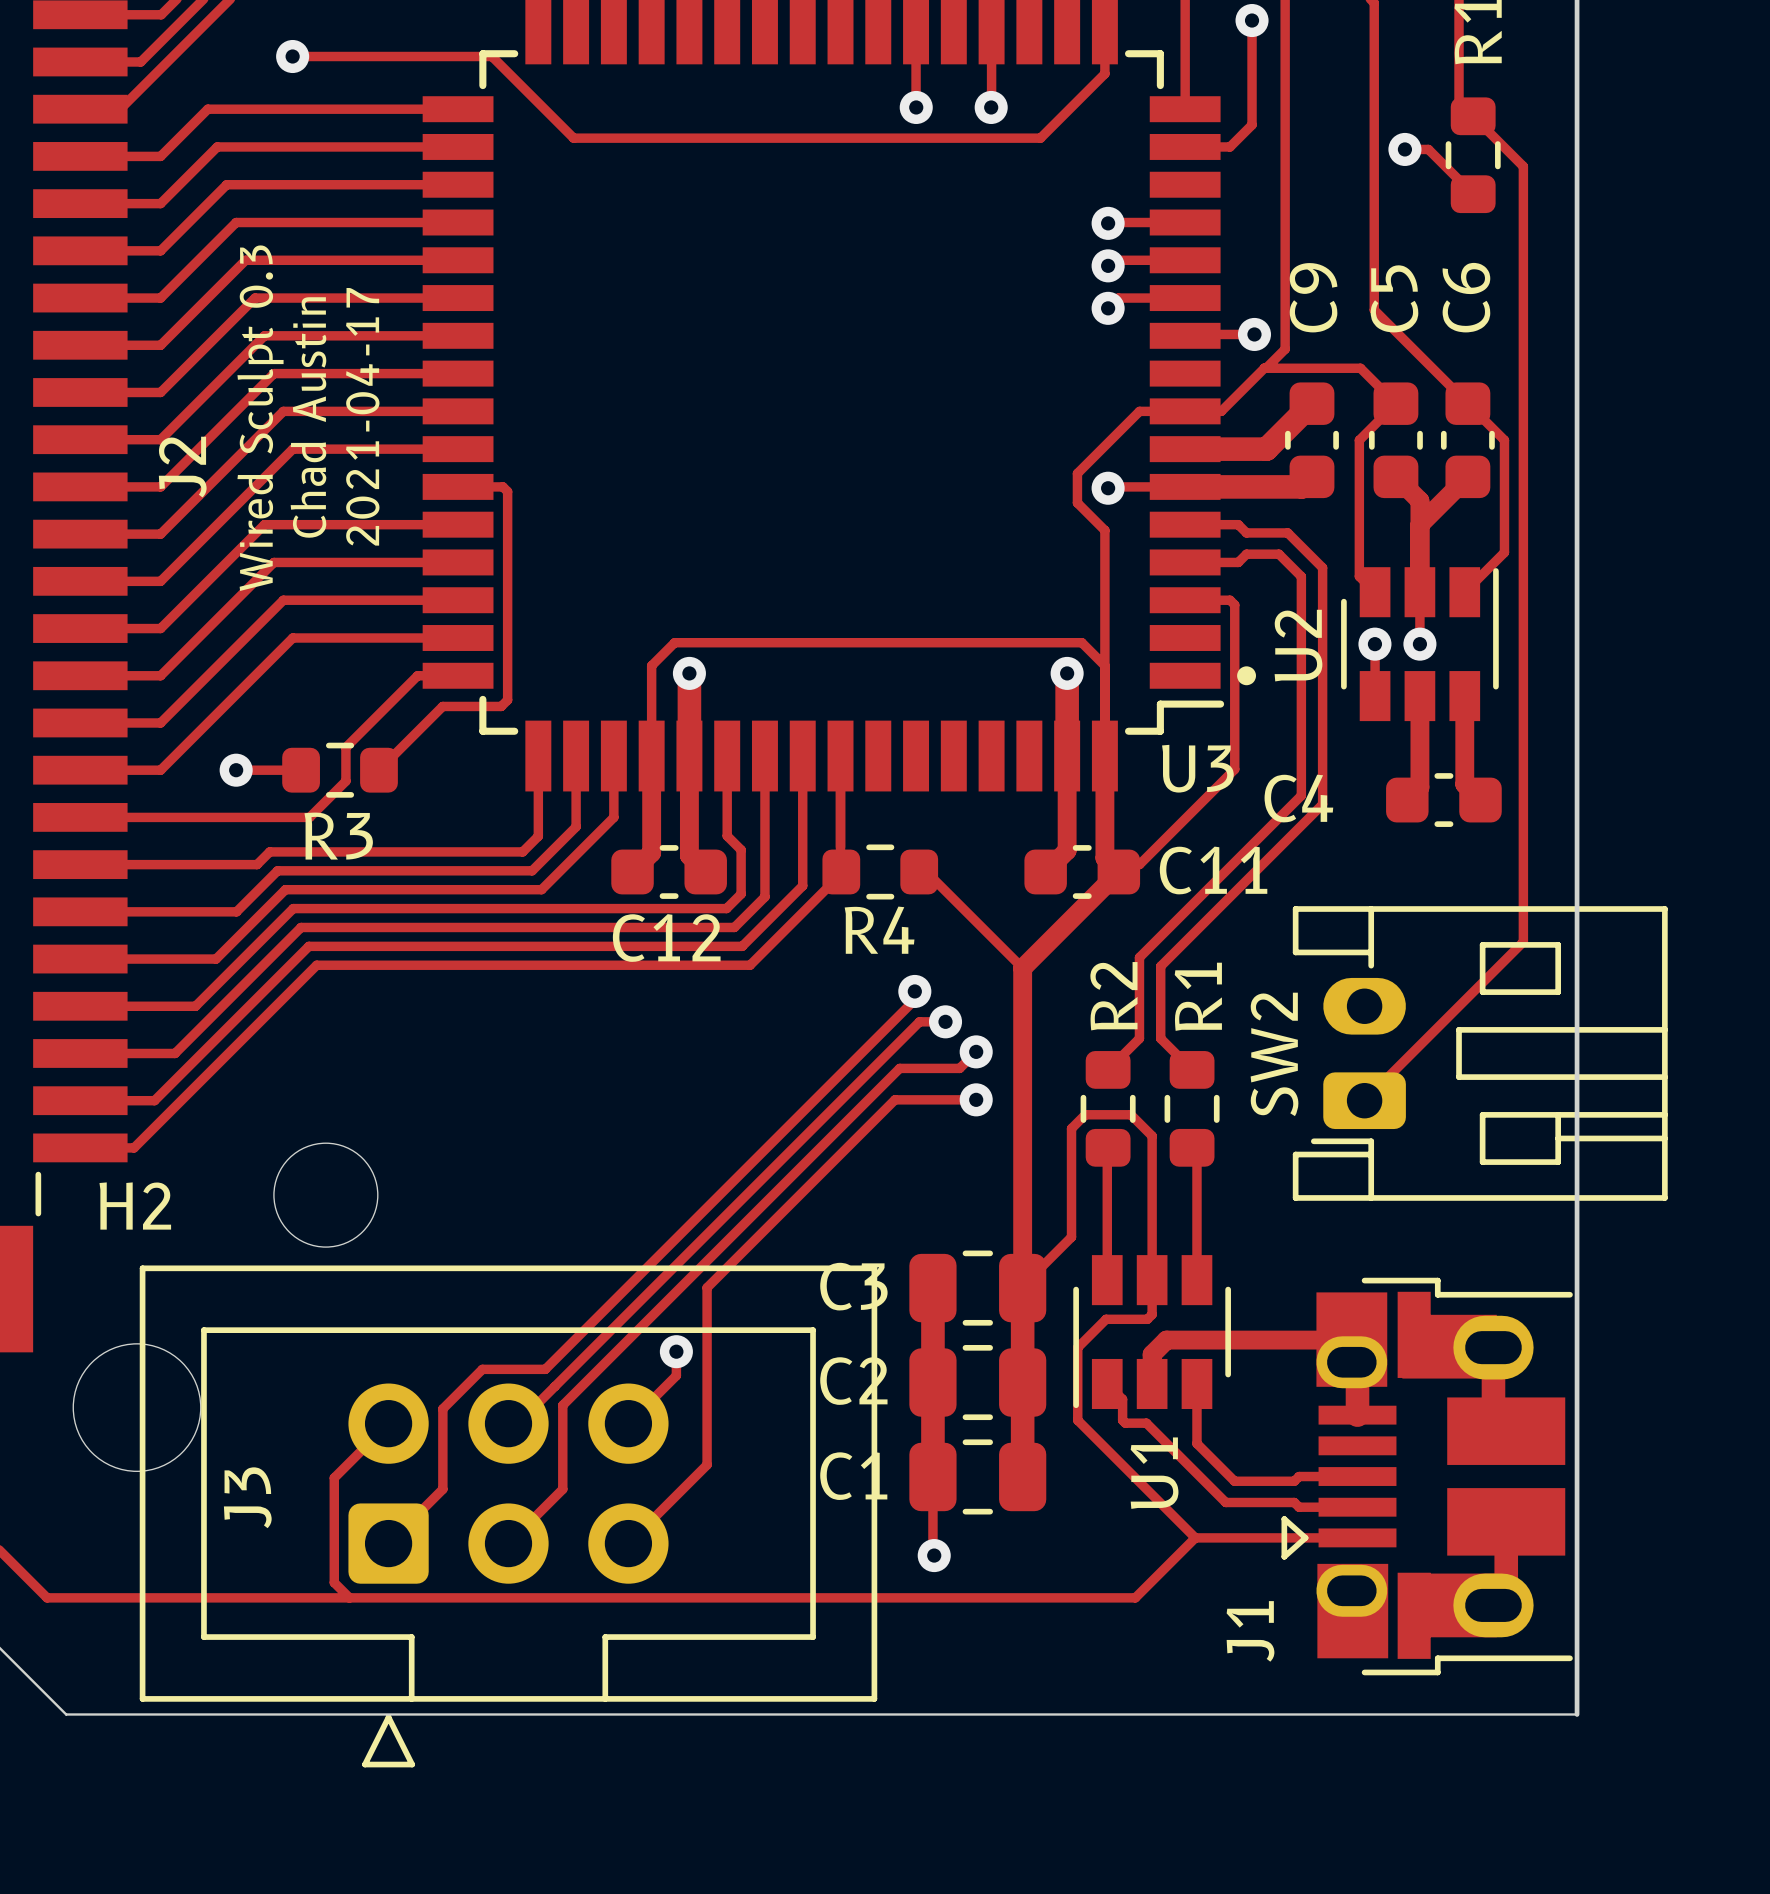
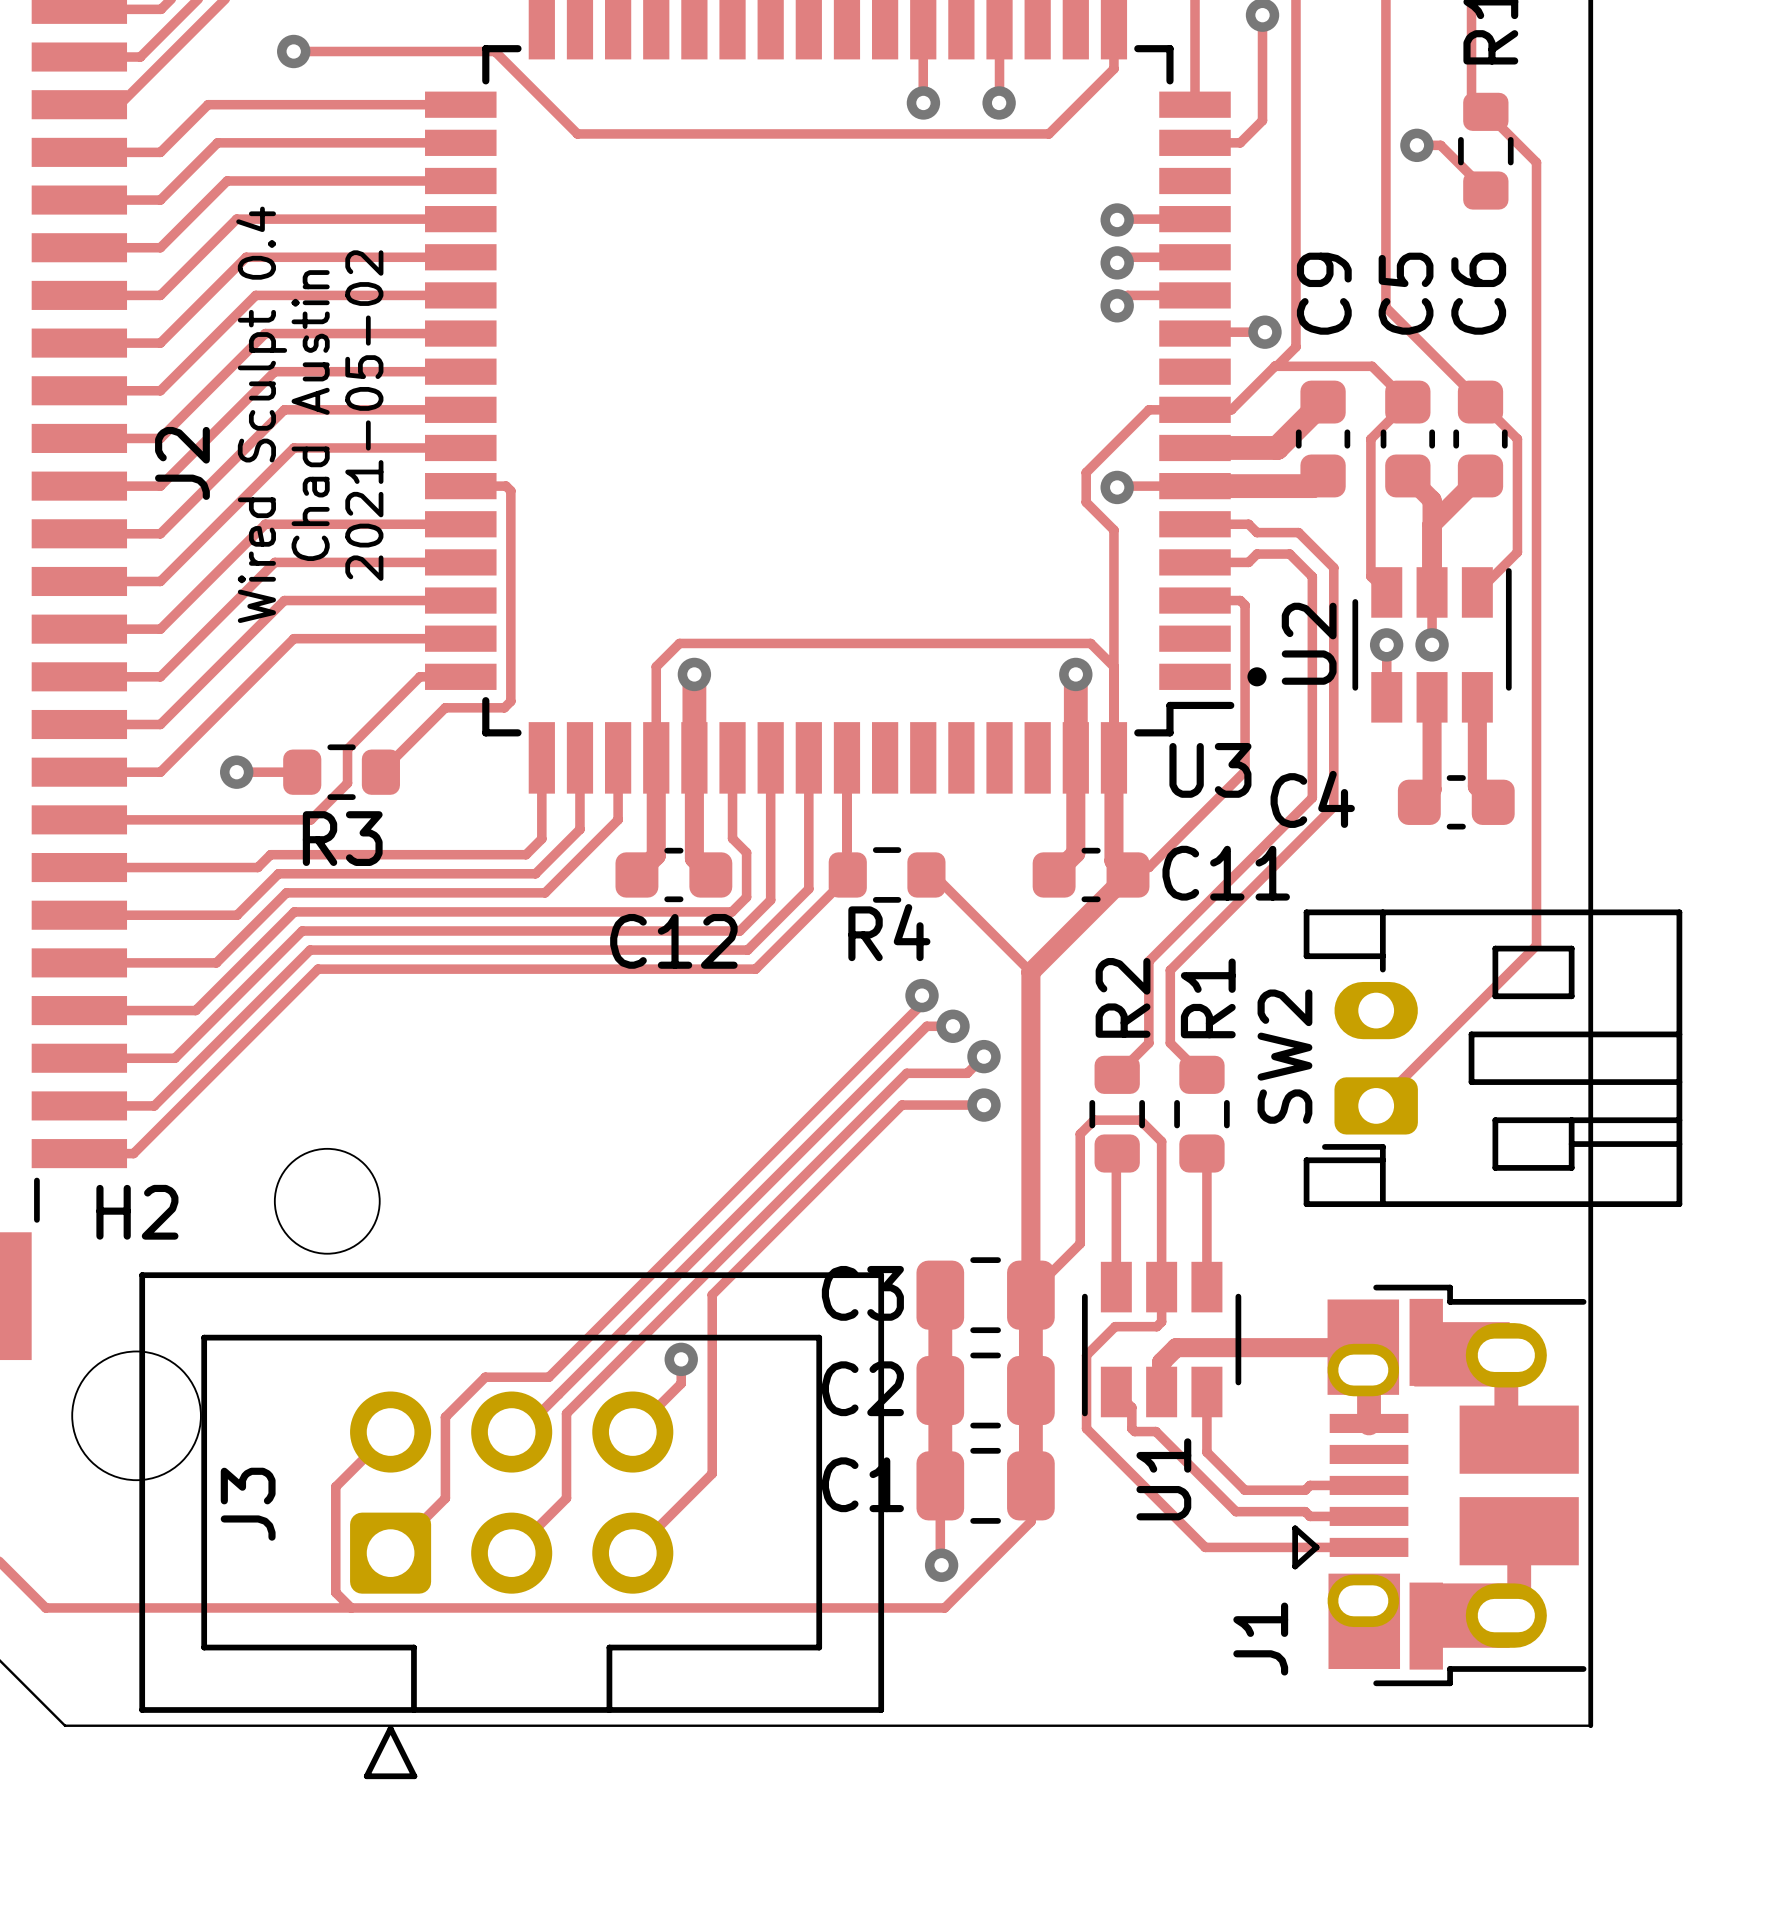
text: 2021-04-17 (362, 416) -> 2021-05-02 (364, 415)
text: Wired Sculpt 0.3 (260, 418) -> Wired Sculpt 0.4 (261, 414)
track: (1195, 1537) (1135, 1597) (937, 1597) -> (1030, 1485) (1030, 1521) (944, 1607)

